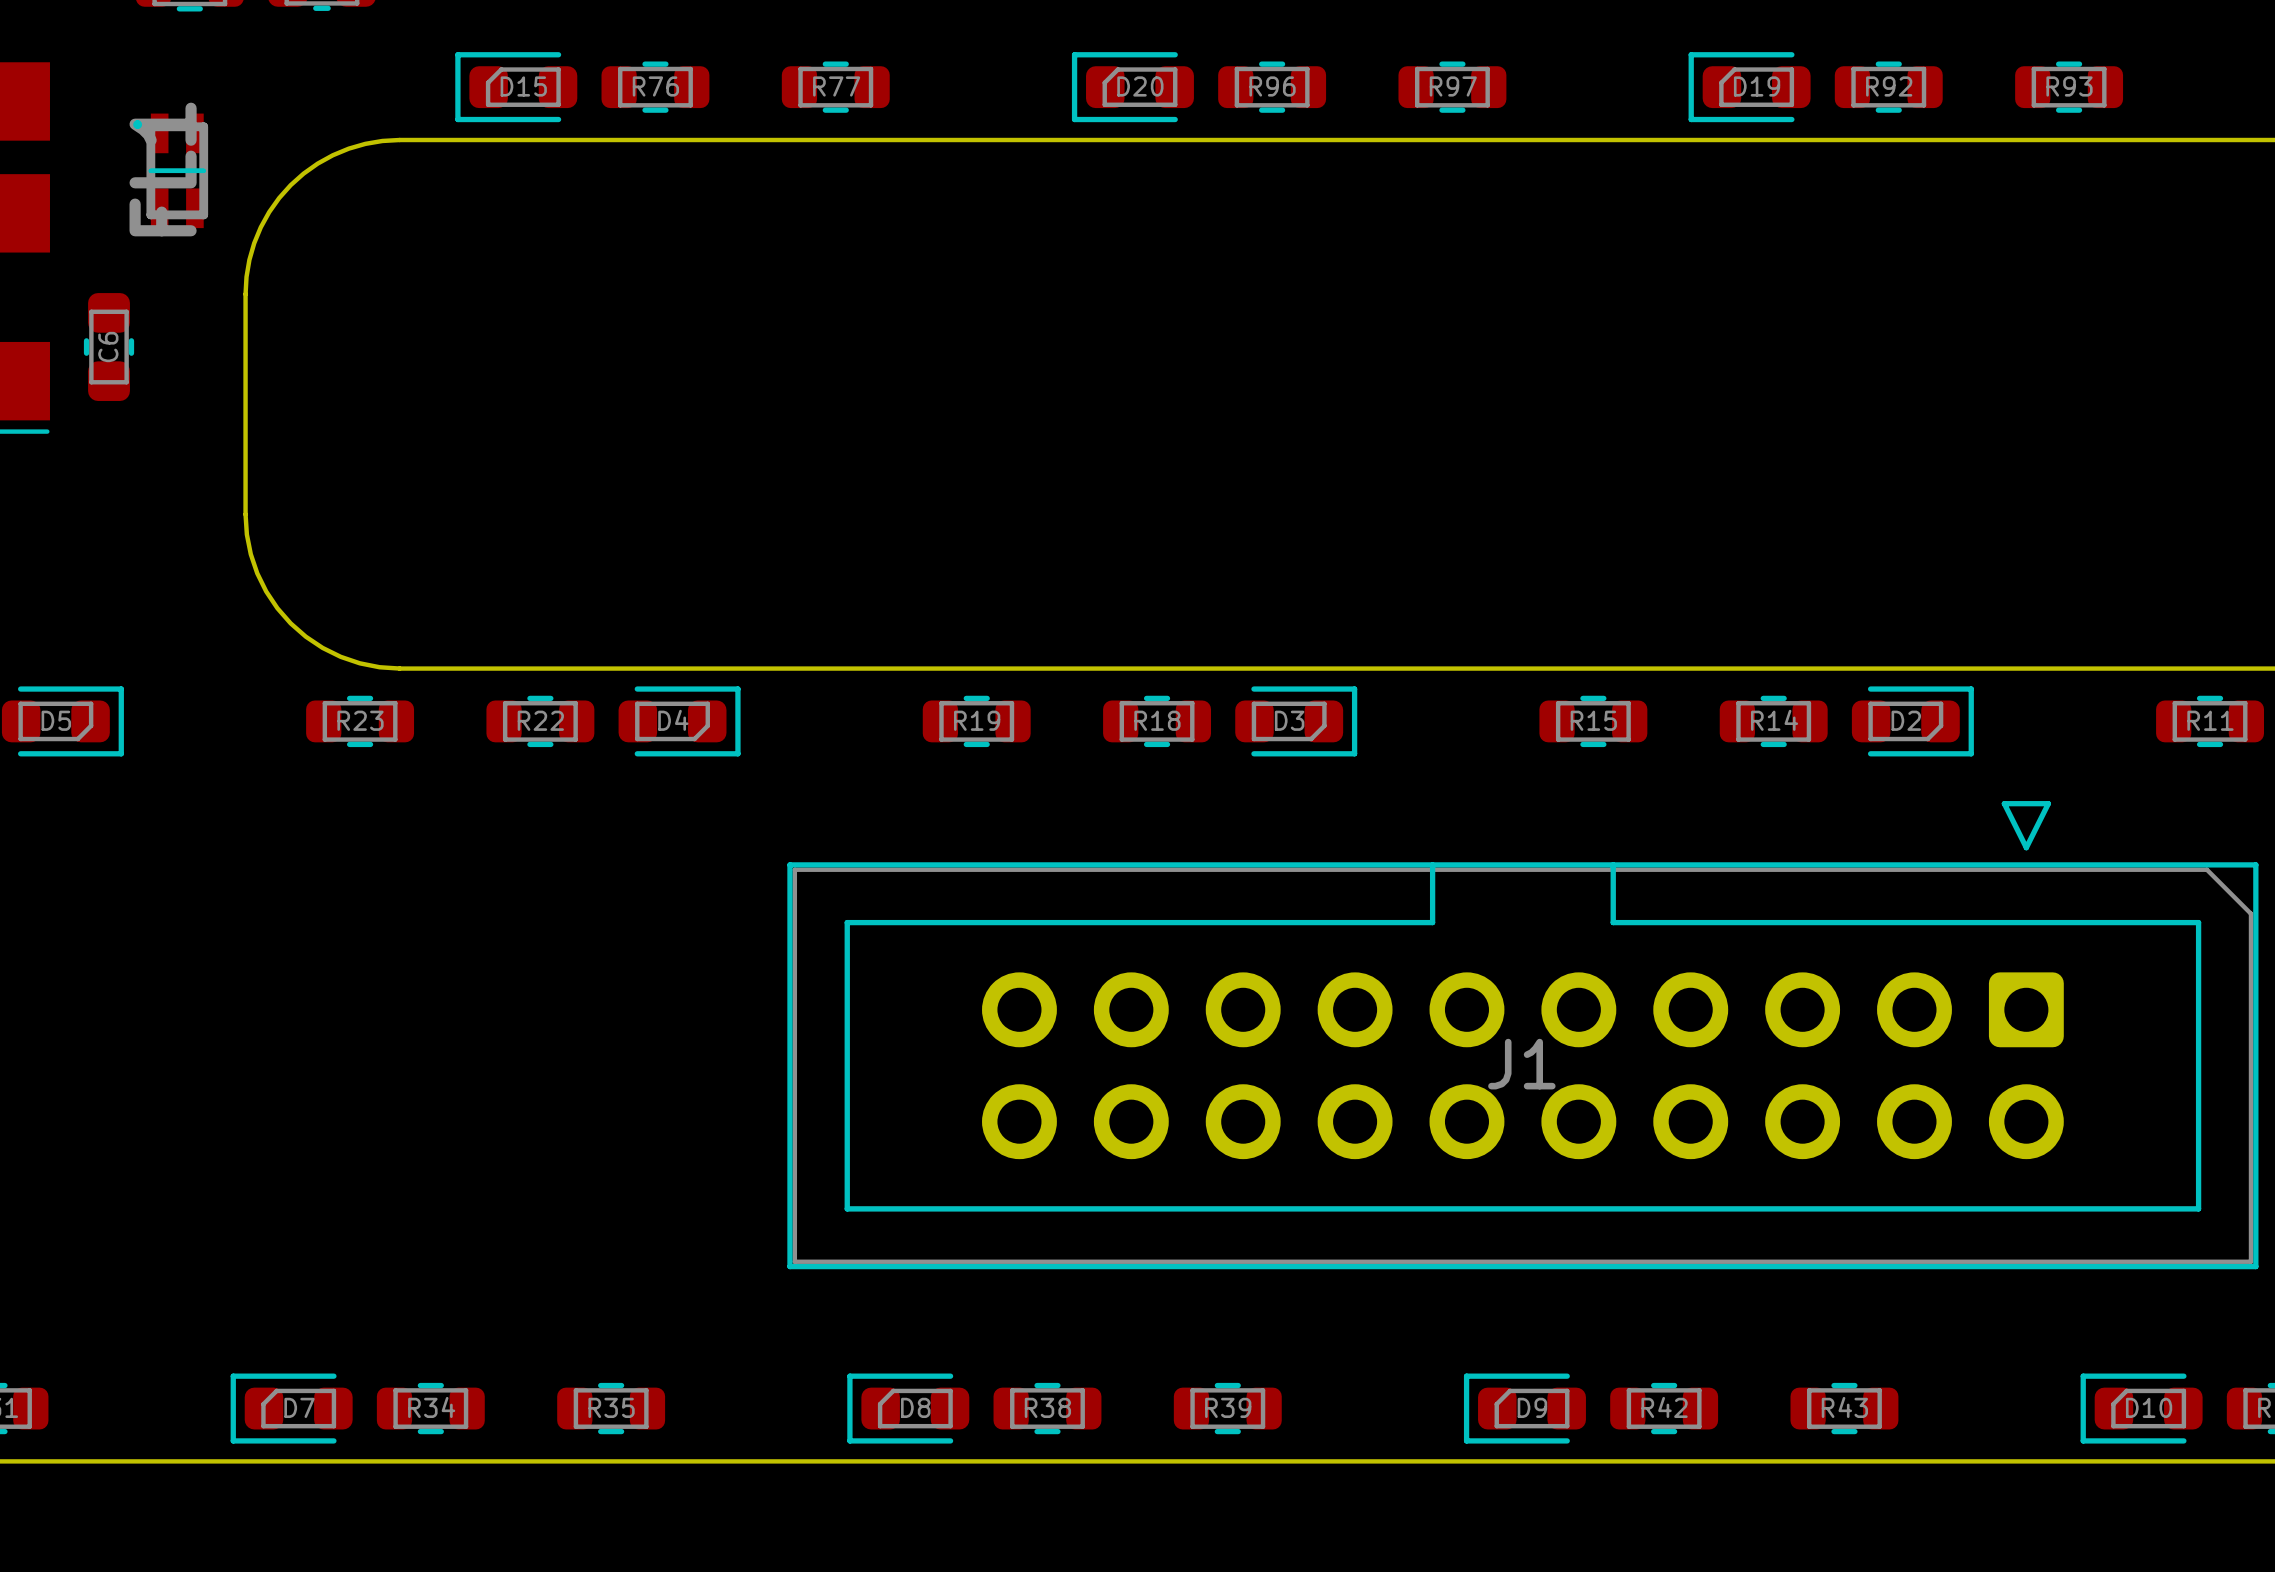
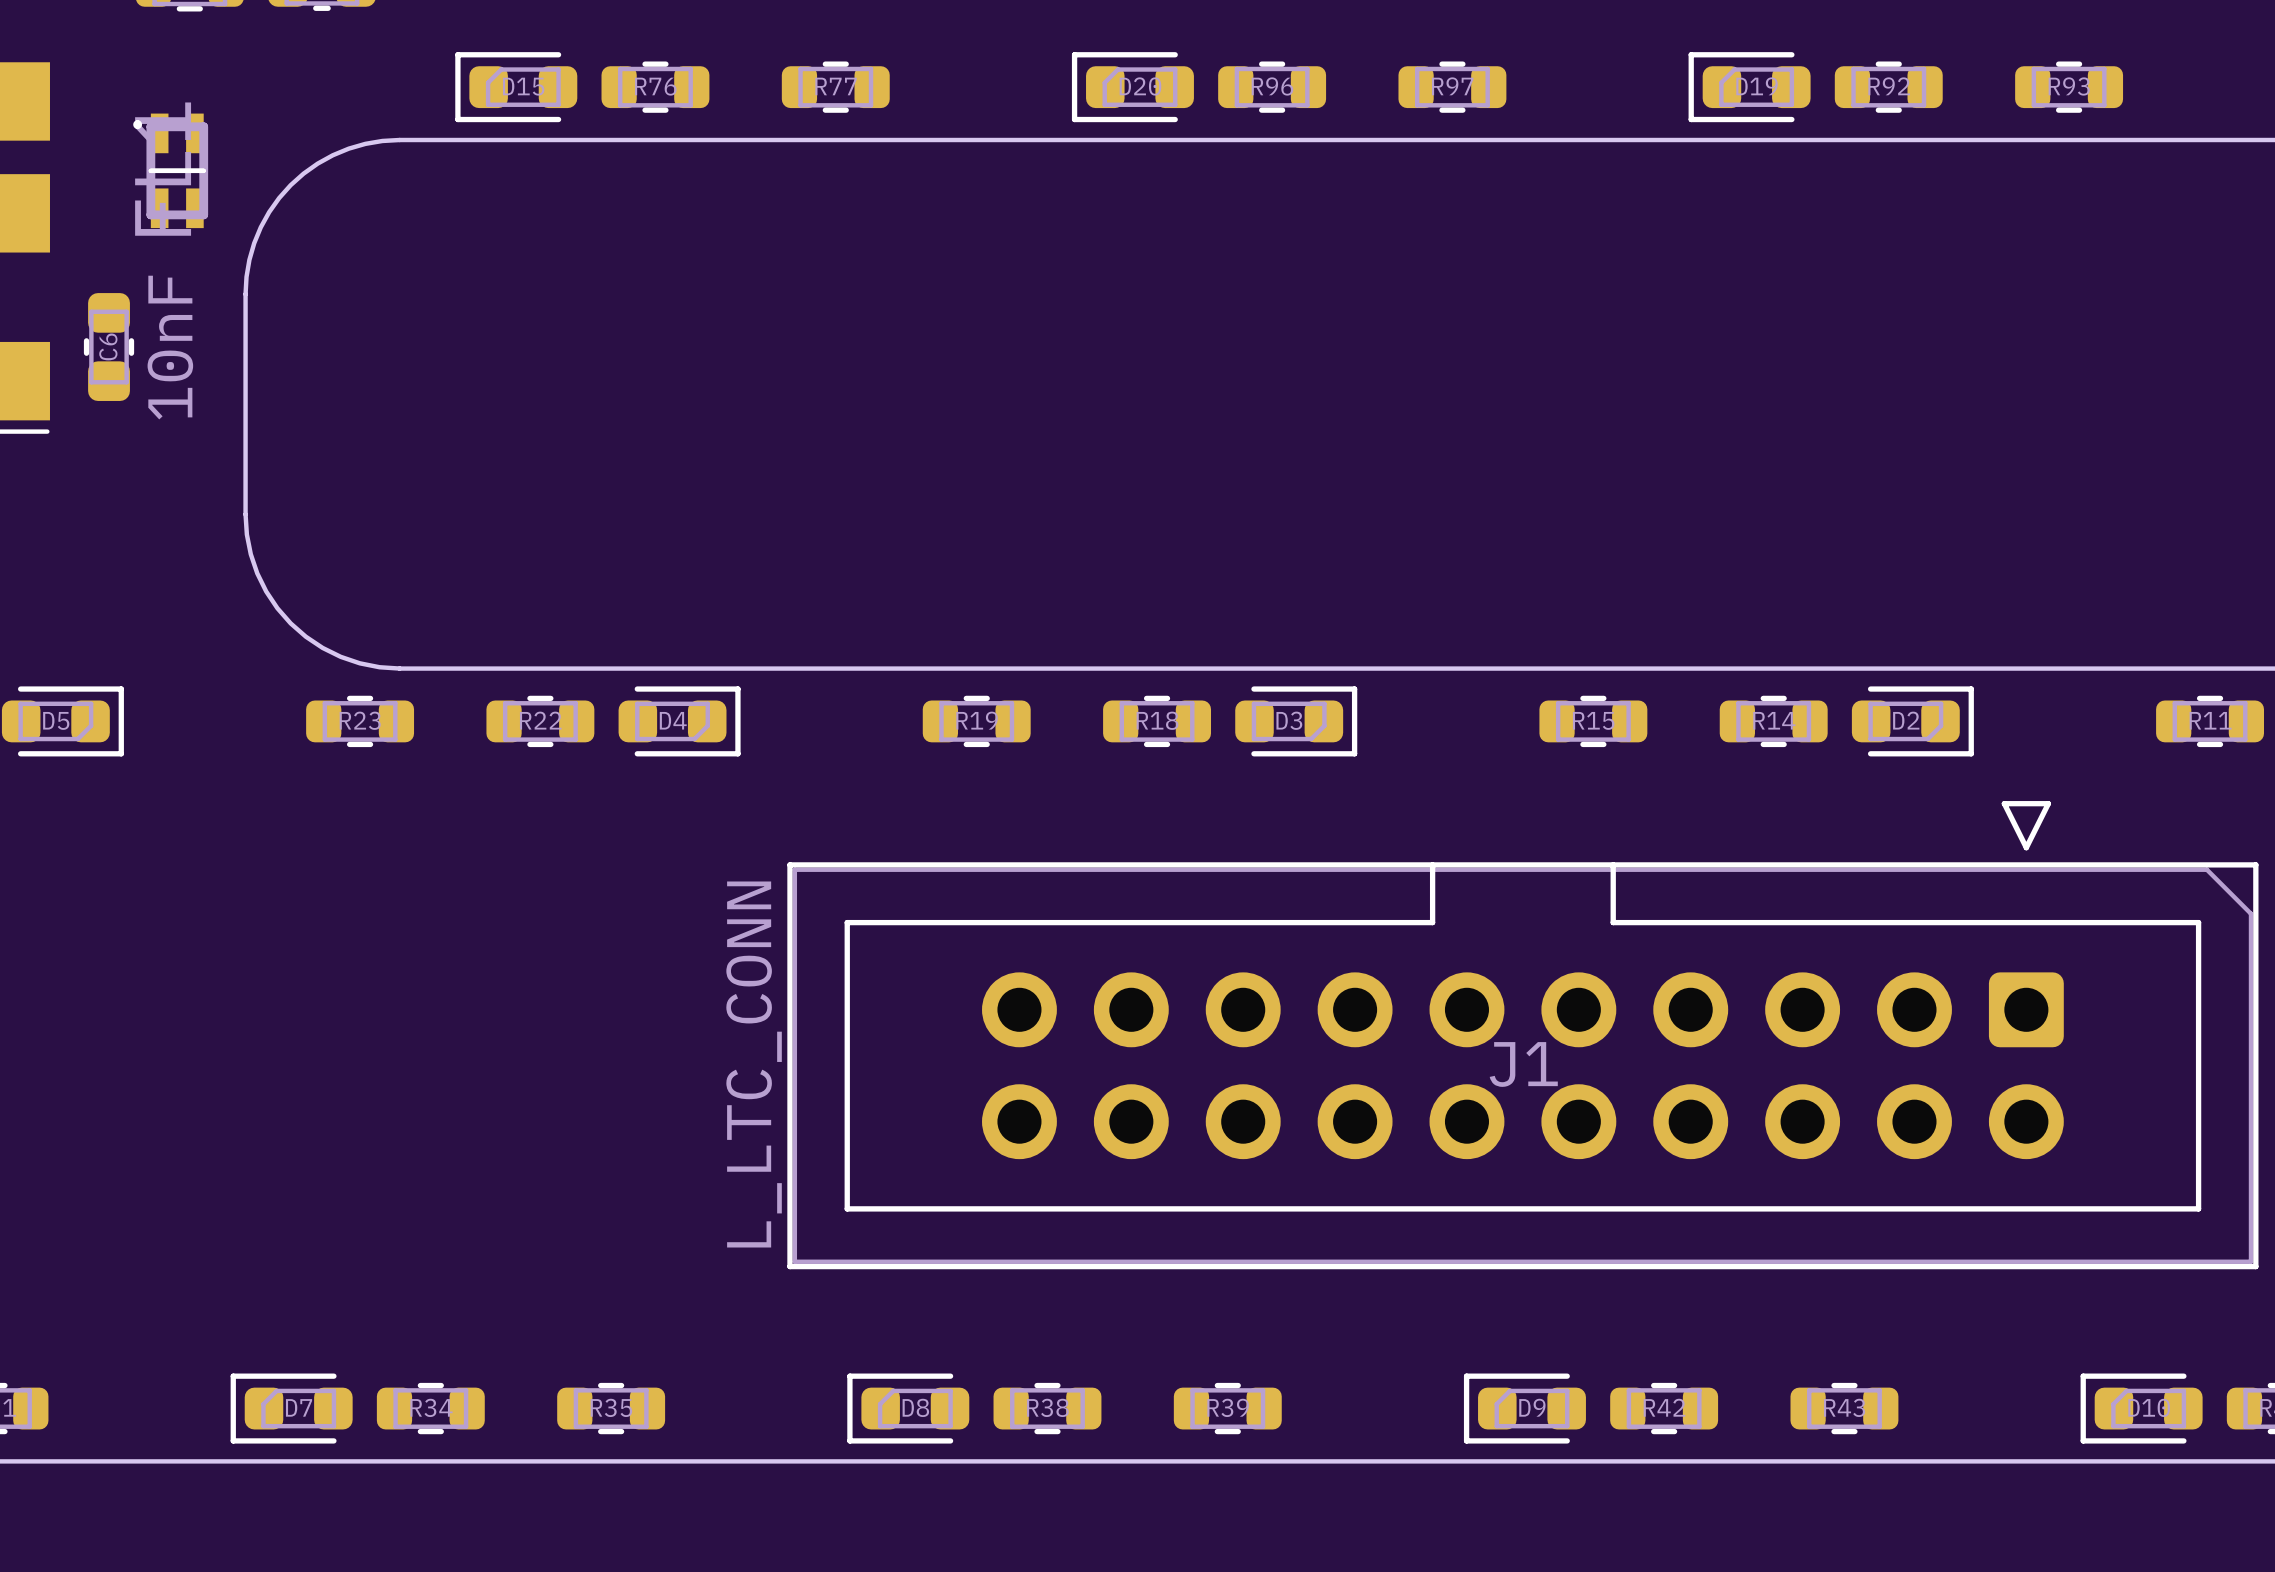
C6 value: none -> 10nF (170, 347)
J1 value: none -> L_LTC_CONN (754, 1064)

